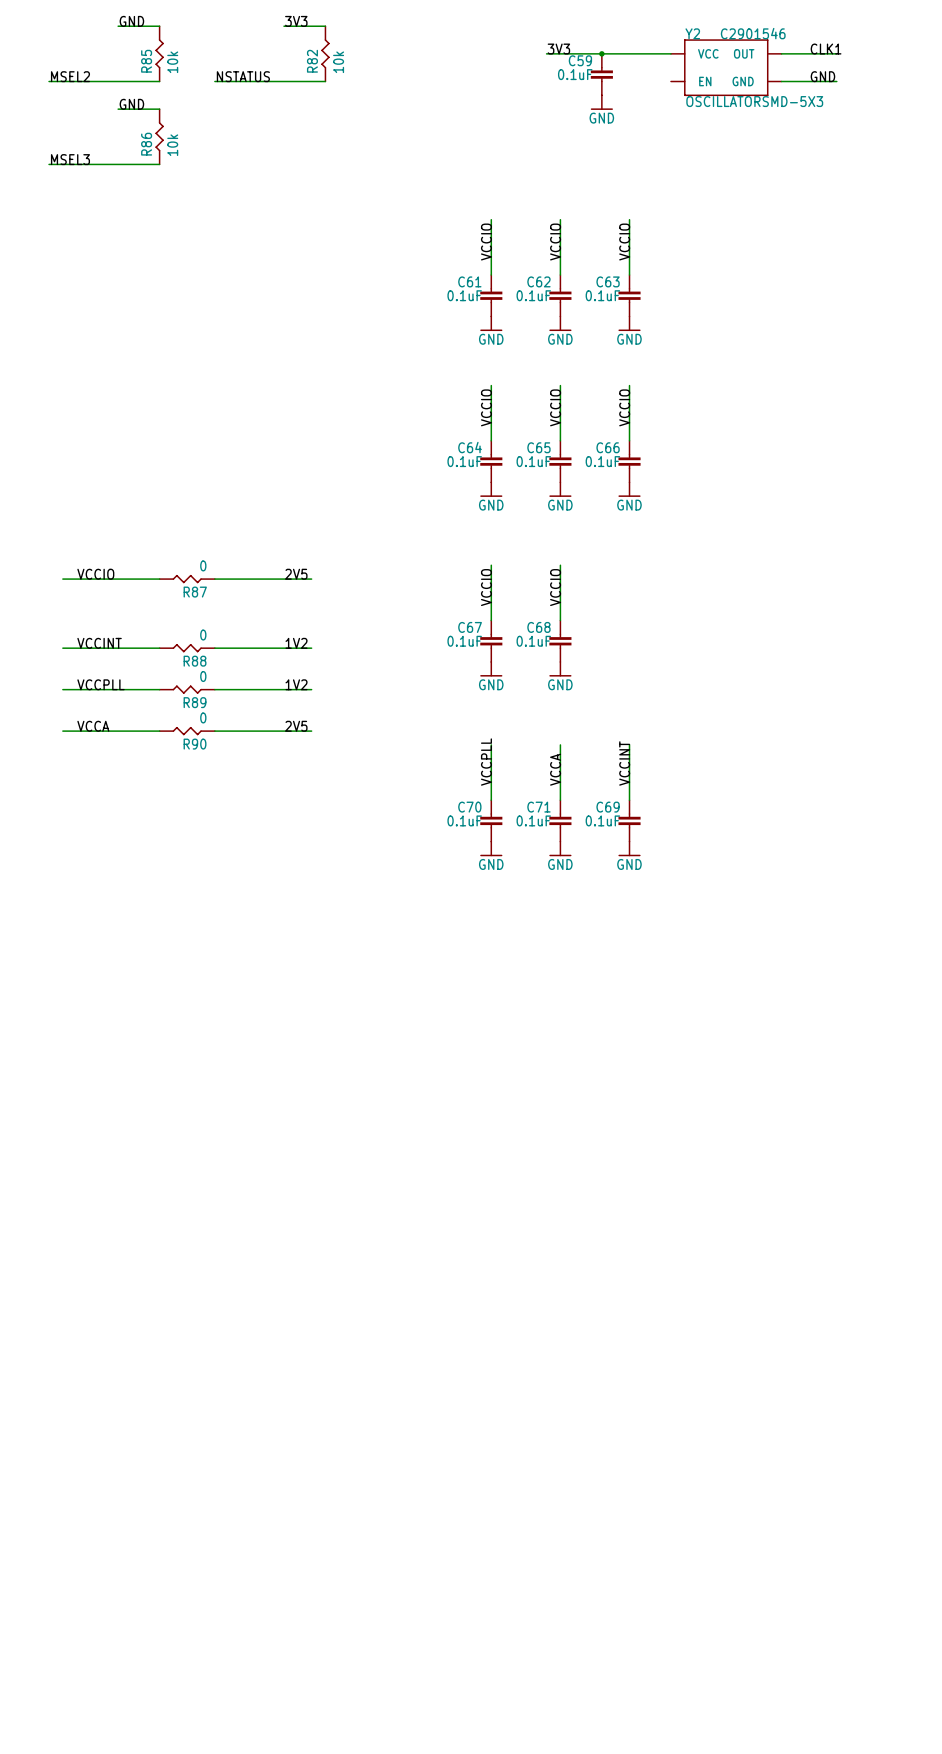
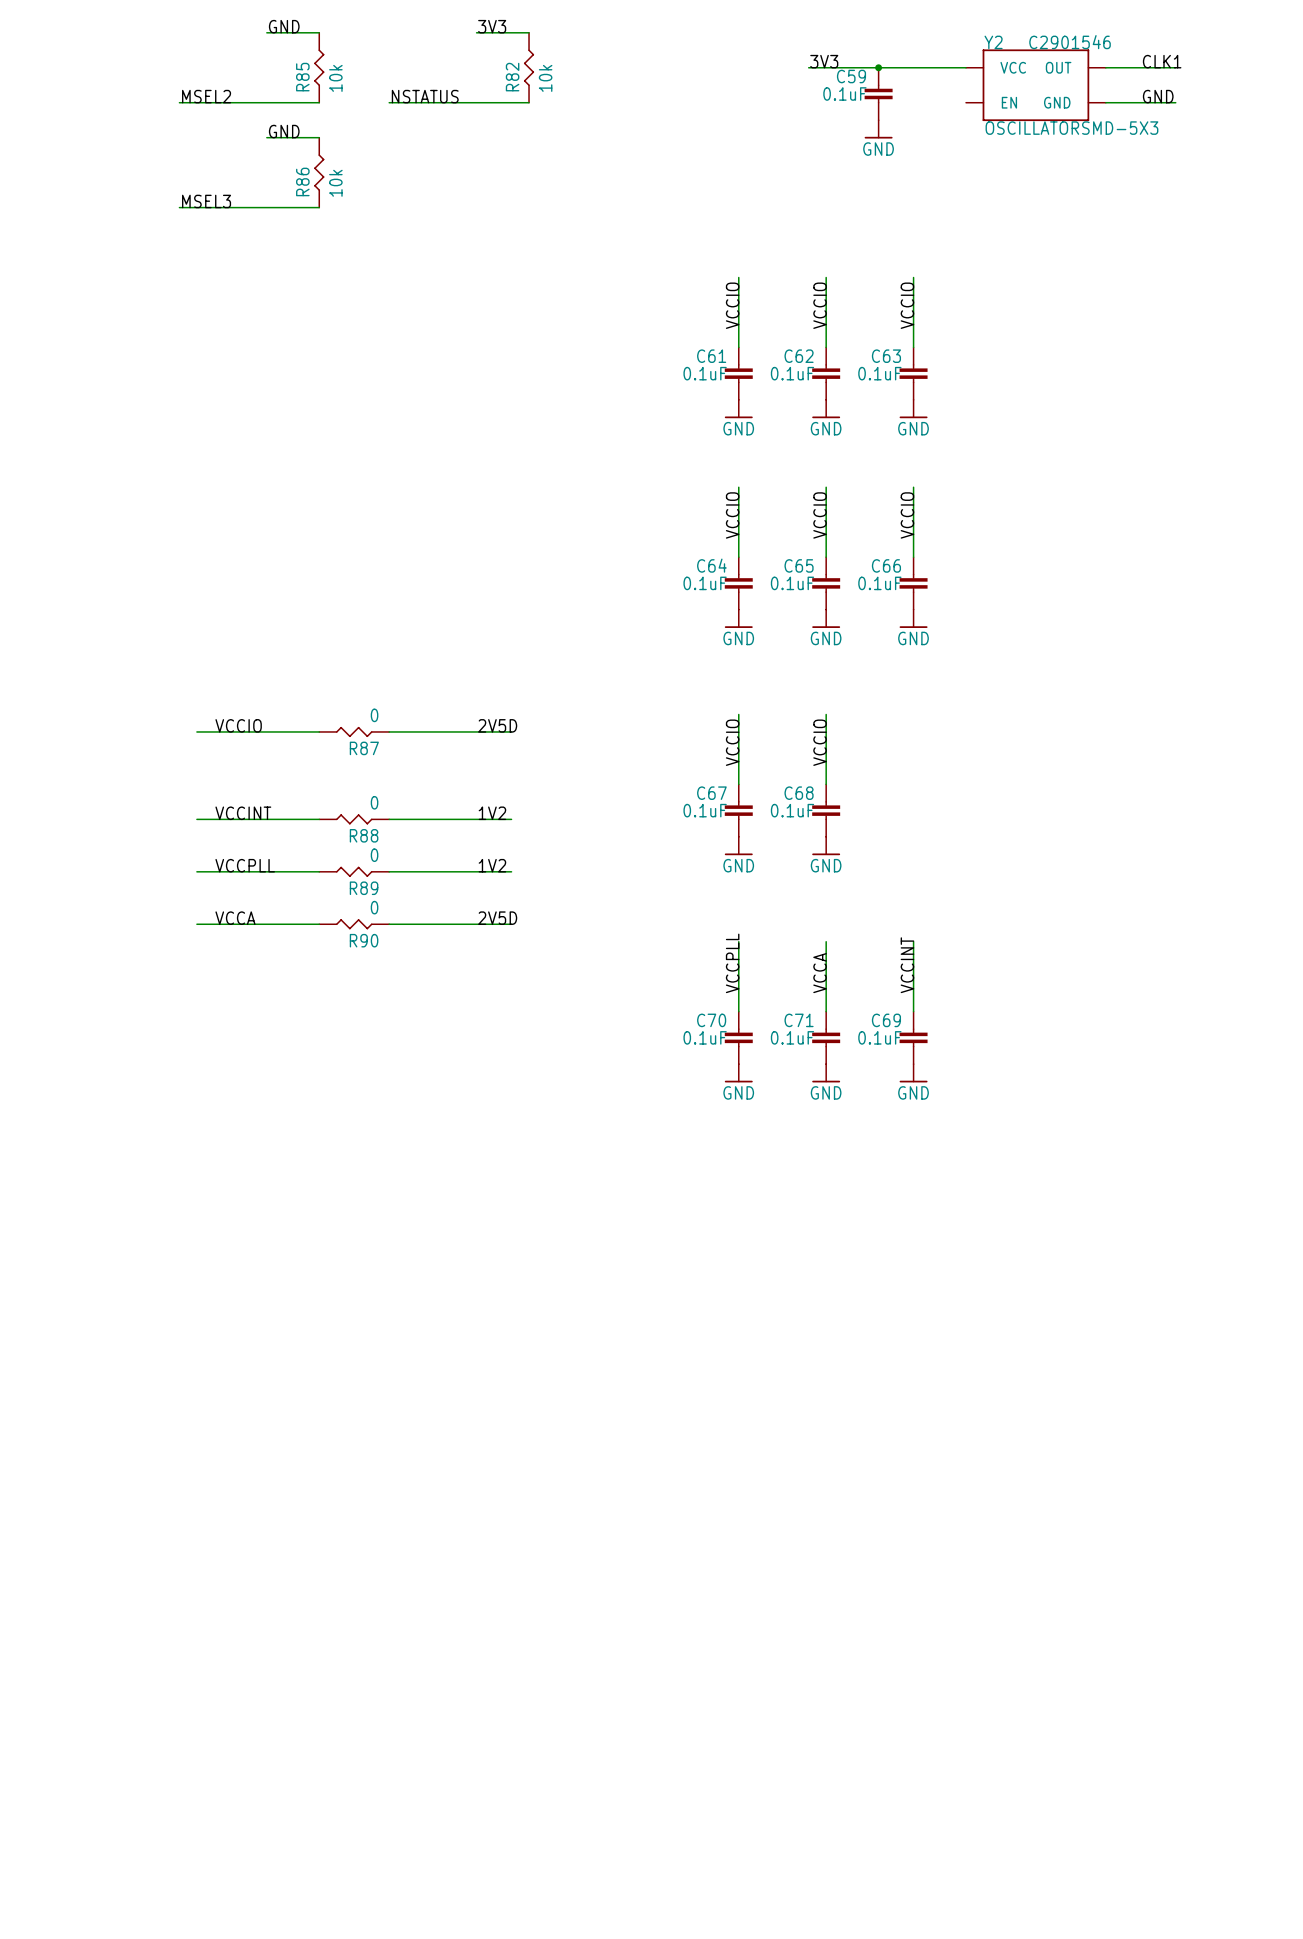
label: 2V5 (296, 574) -> 2V5D (497, 725)
label: 2V5 (296, 726) -> 2V5D (497, 918)

